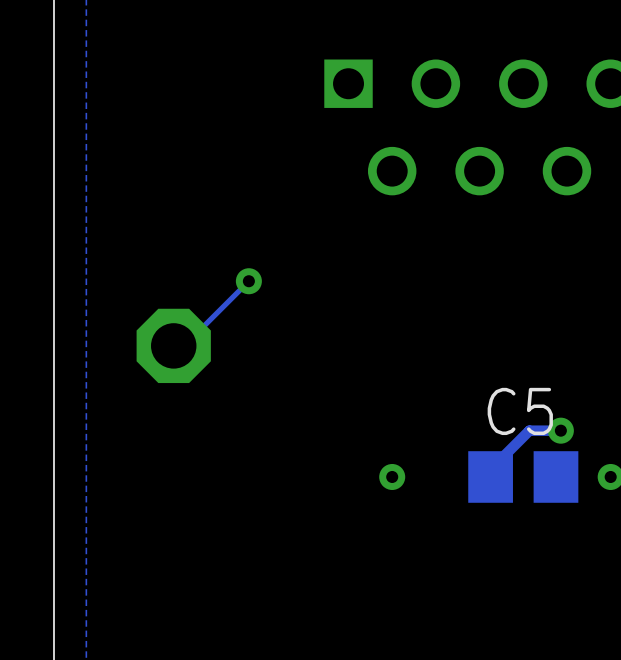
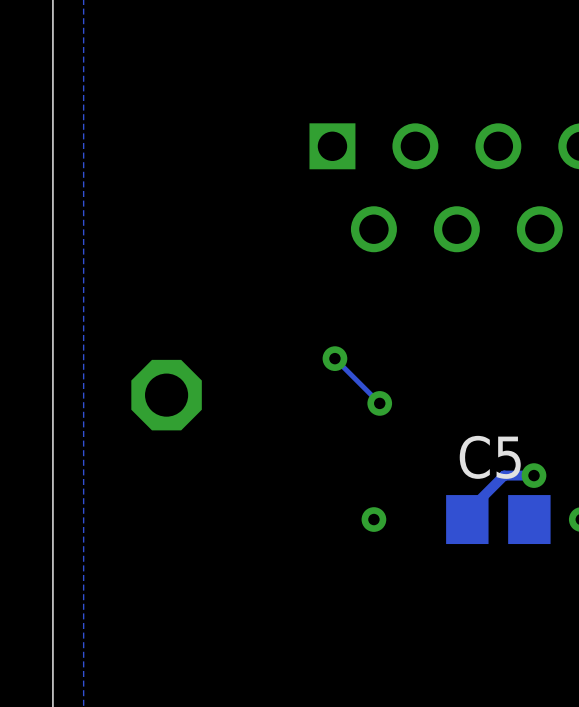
track: (248, 281) (185, 344) (173, 345) -> none
via: (248, 281) -> none
track: none -> (334, 358) (379, 403)
via: none -> (334, 358)
via: none -> (379, 403)

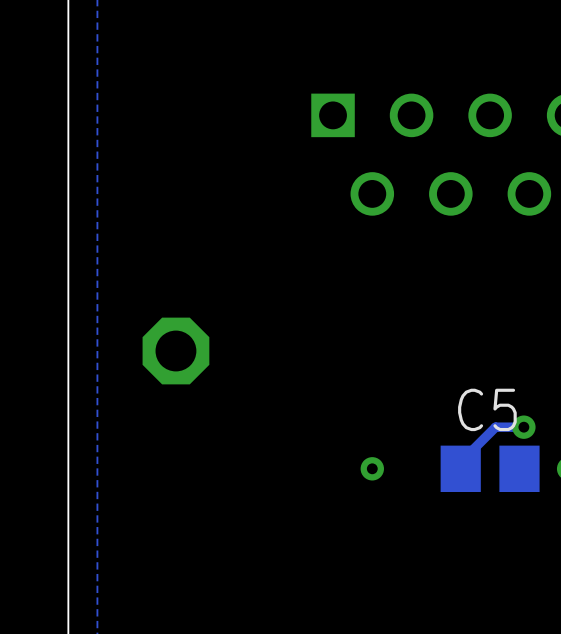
track: (334, 358) (379, 403) -> none
via: (334, 358) -> none
via: (379, 403) -> none

